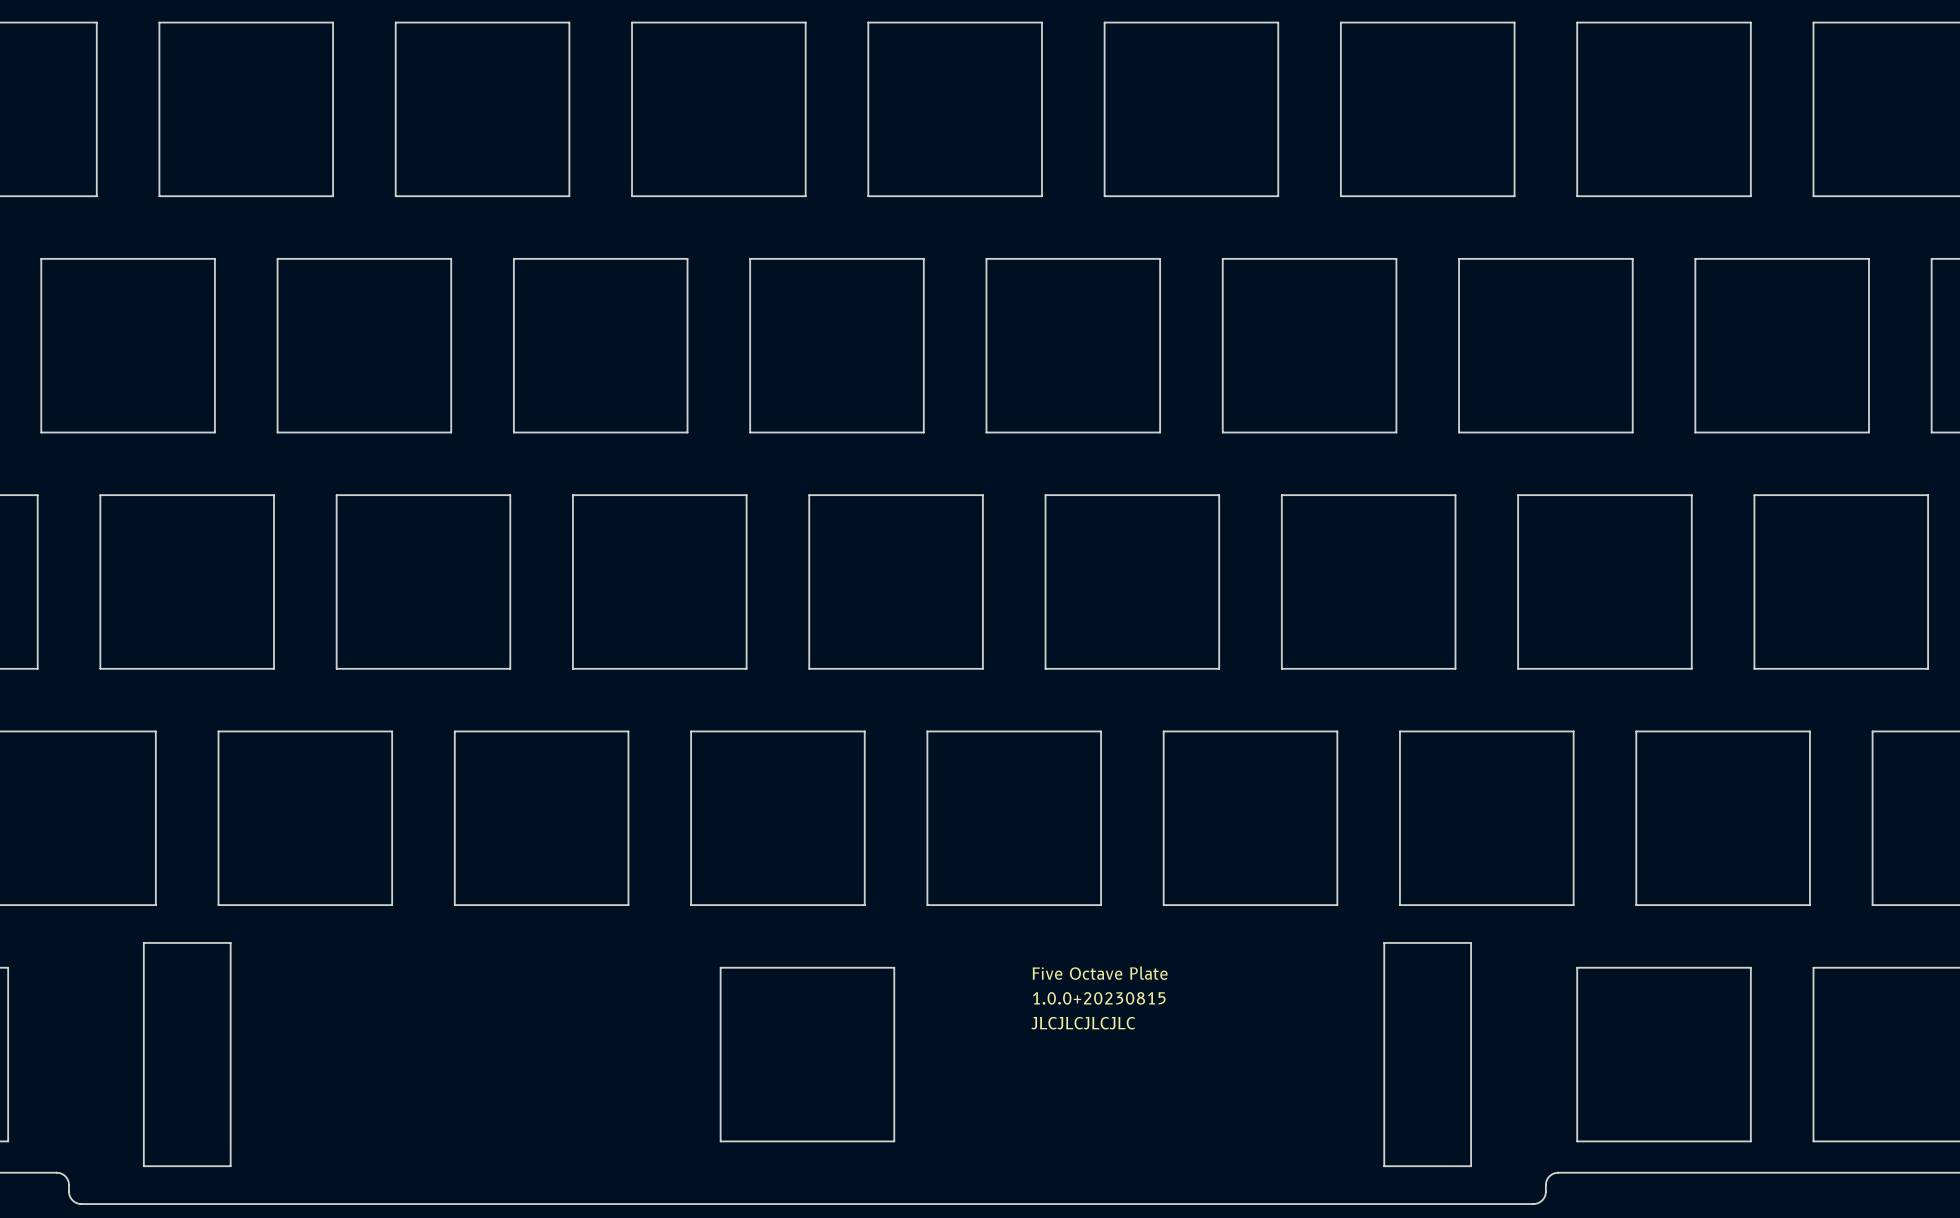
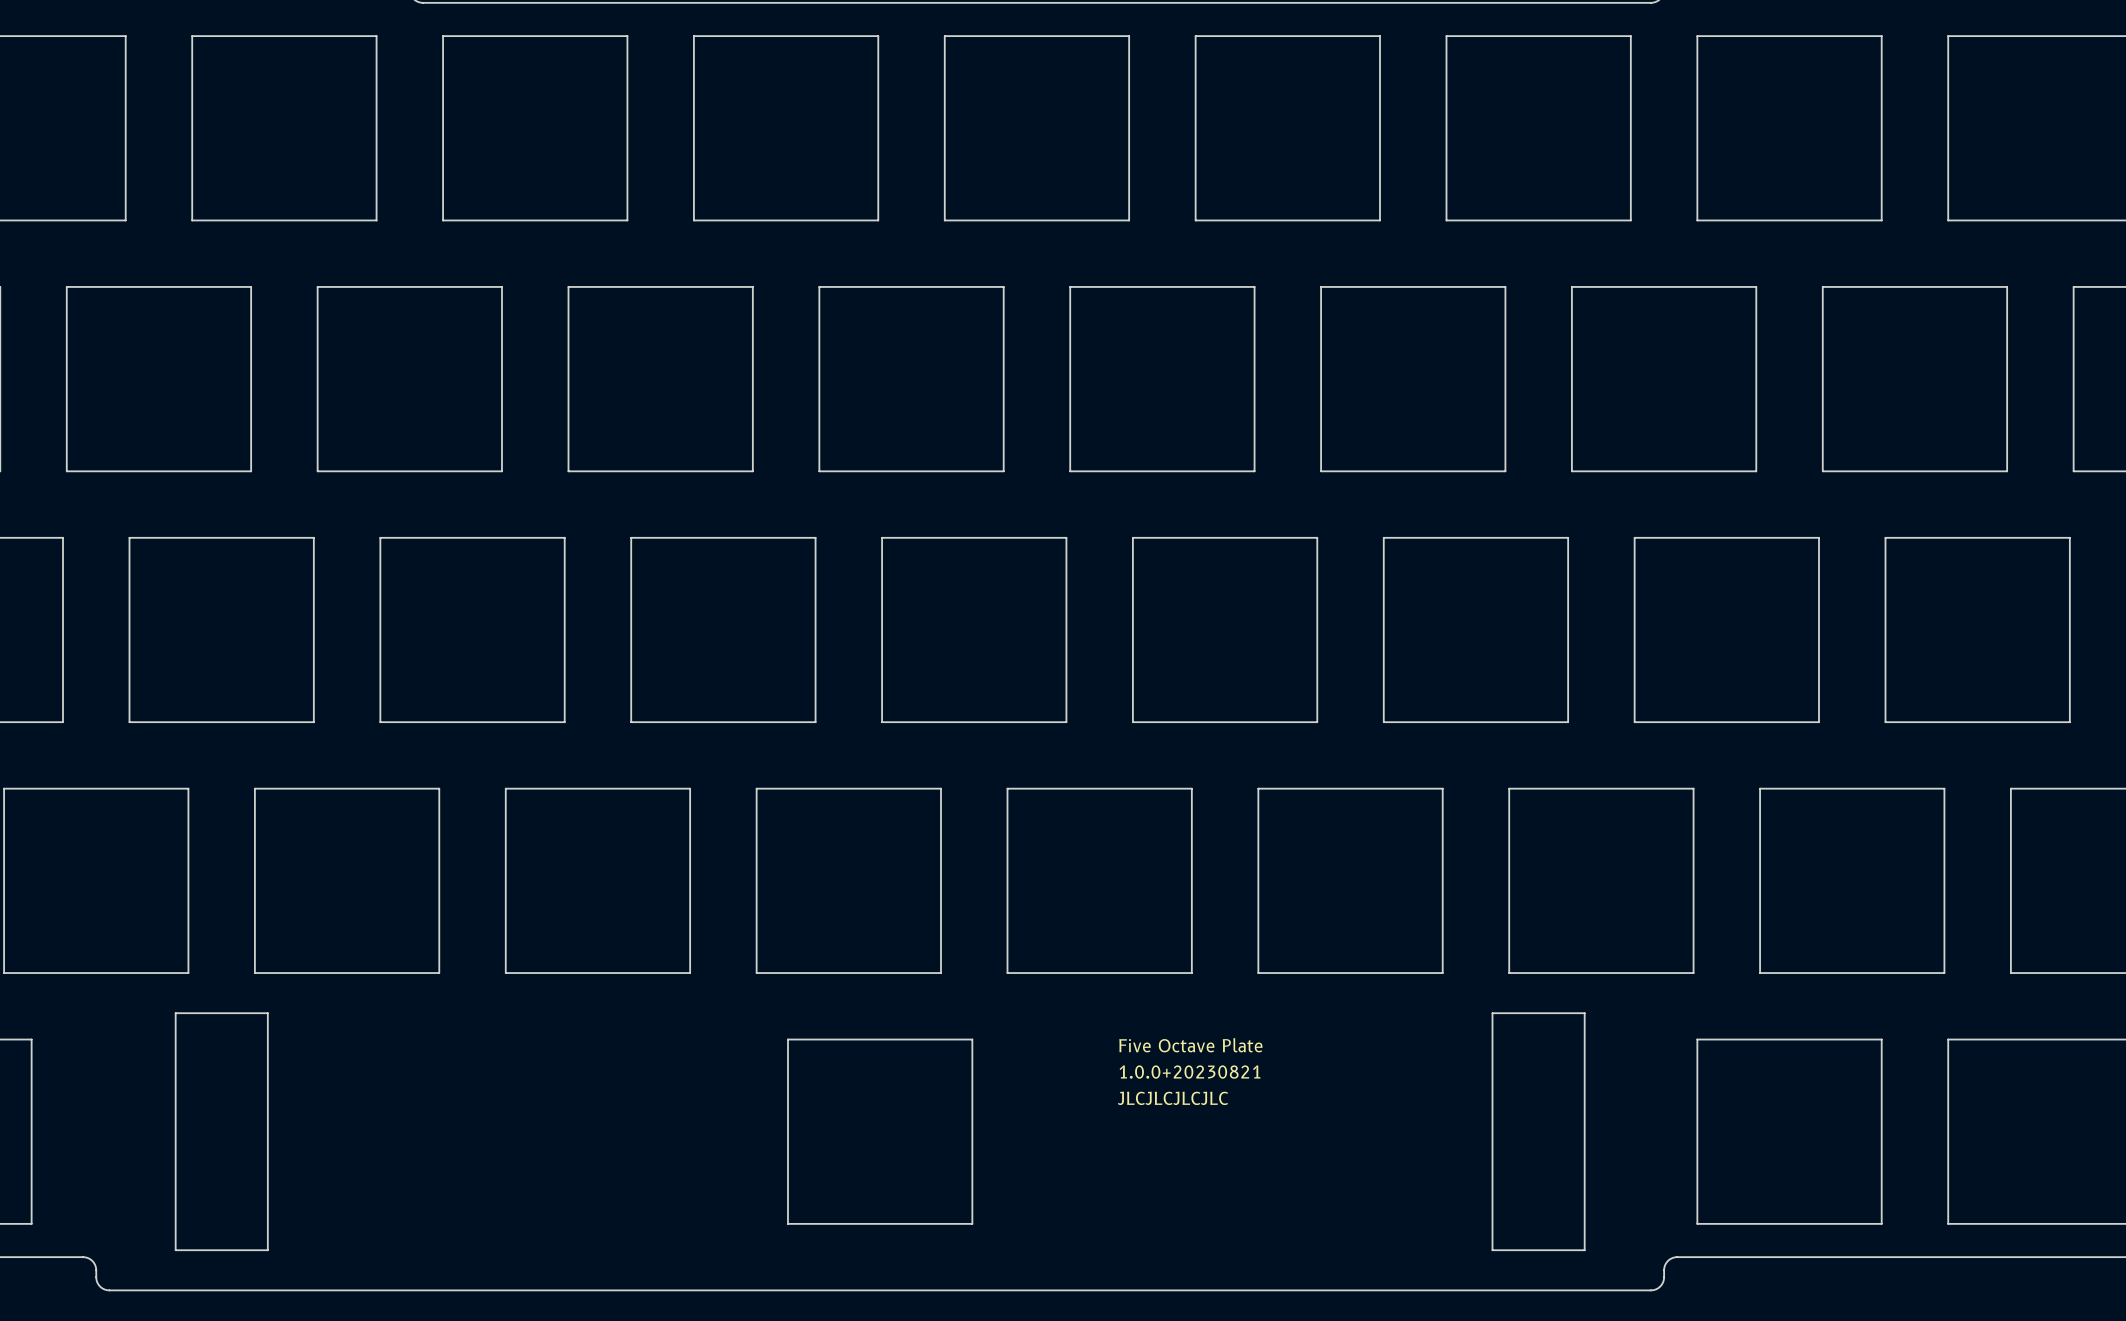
text: 1.0.0+20230815 (1099, 998) -> 1.0.0+20230821 (1189, 1072)

